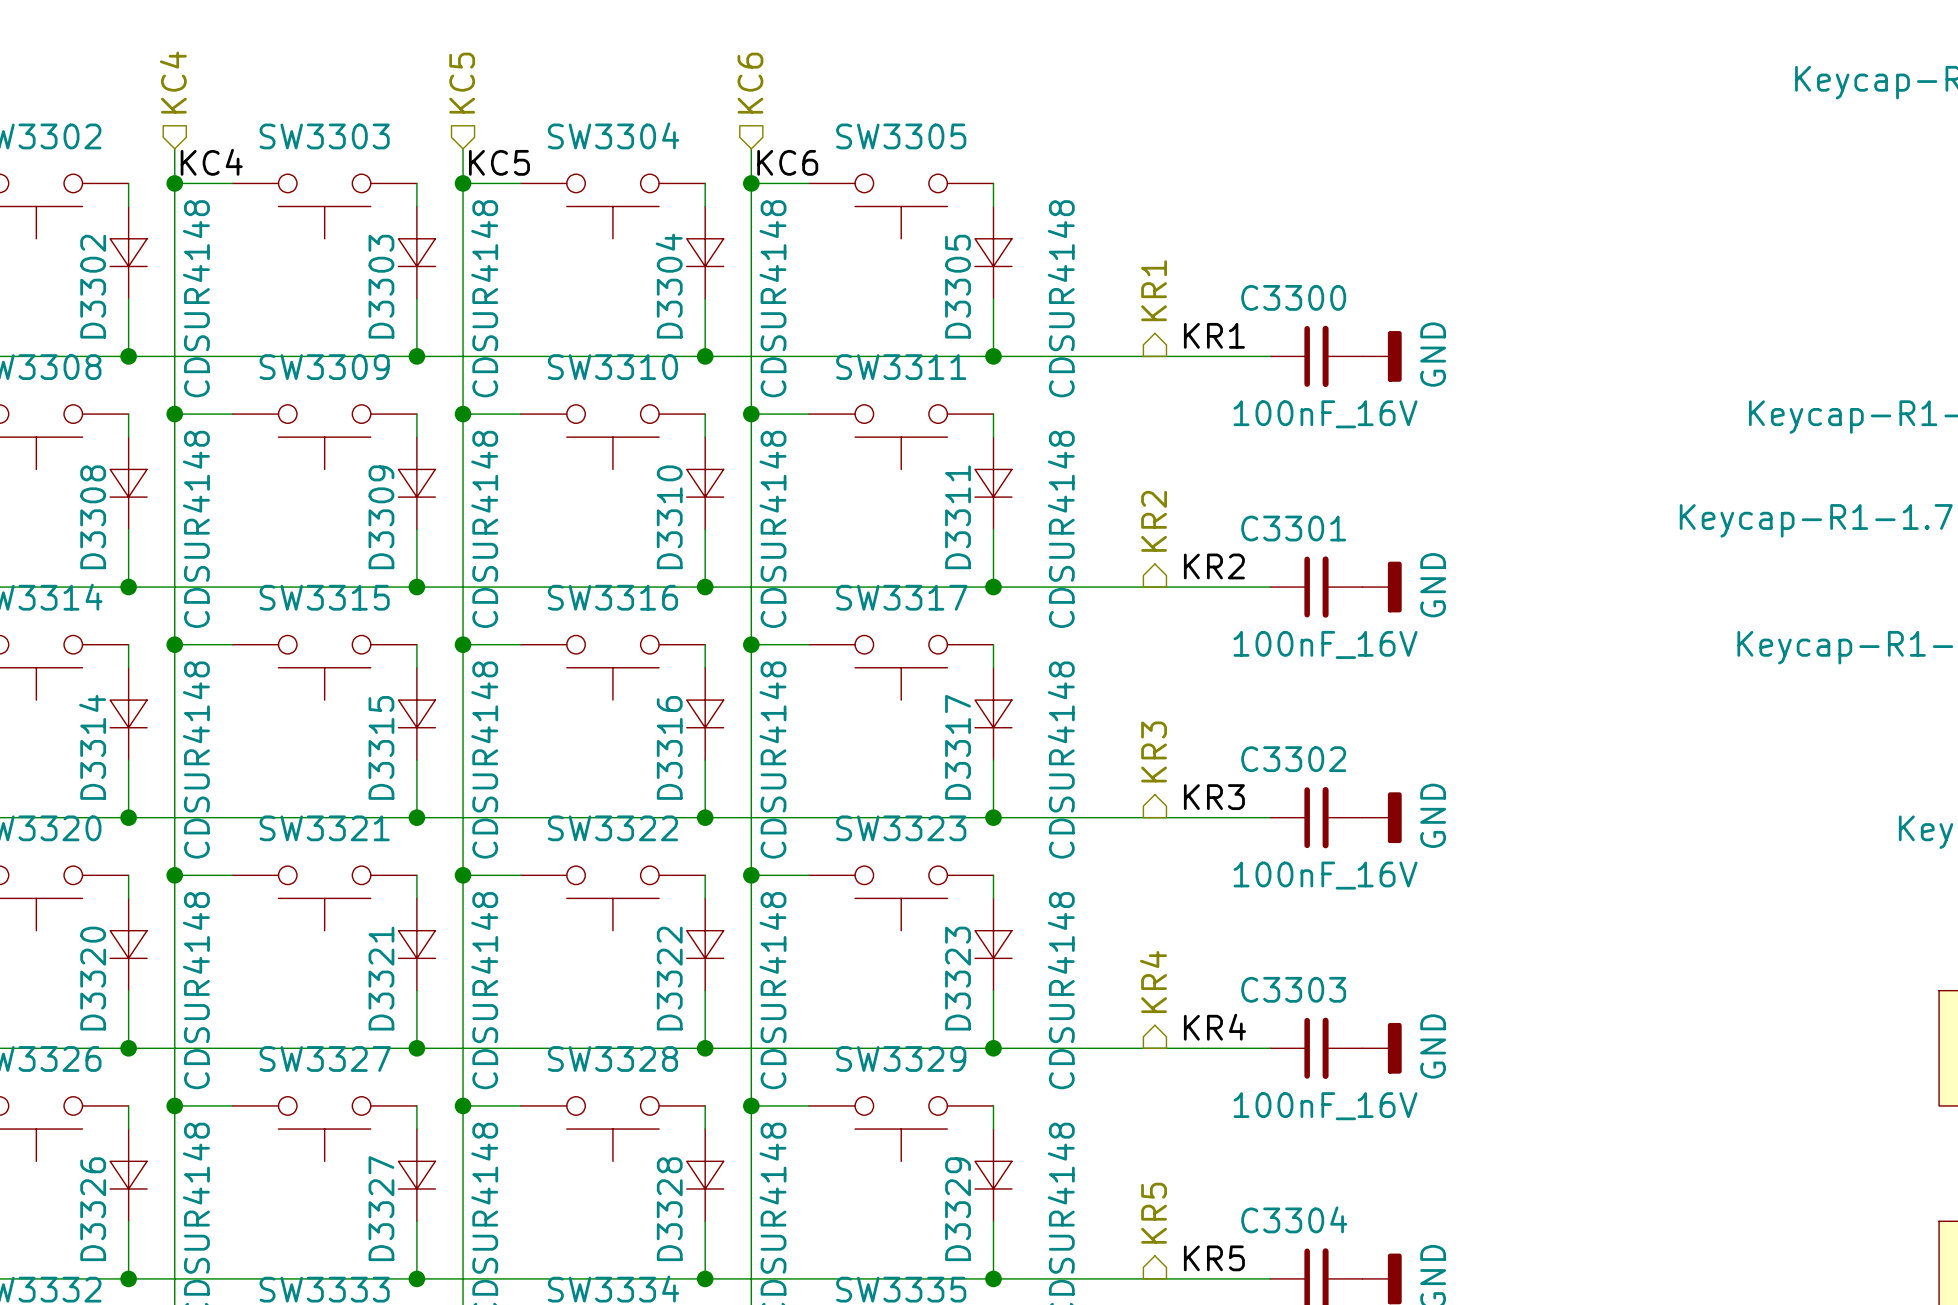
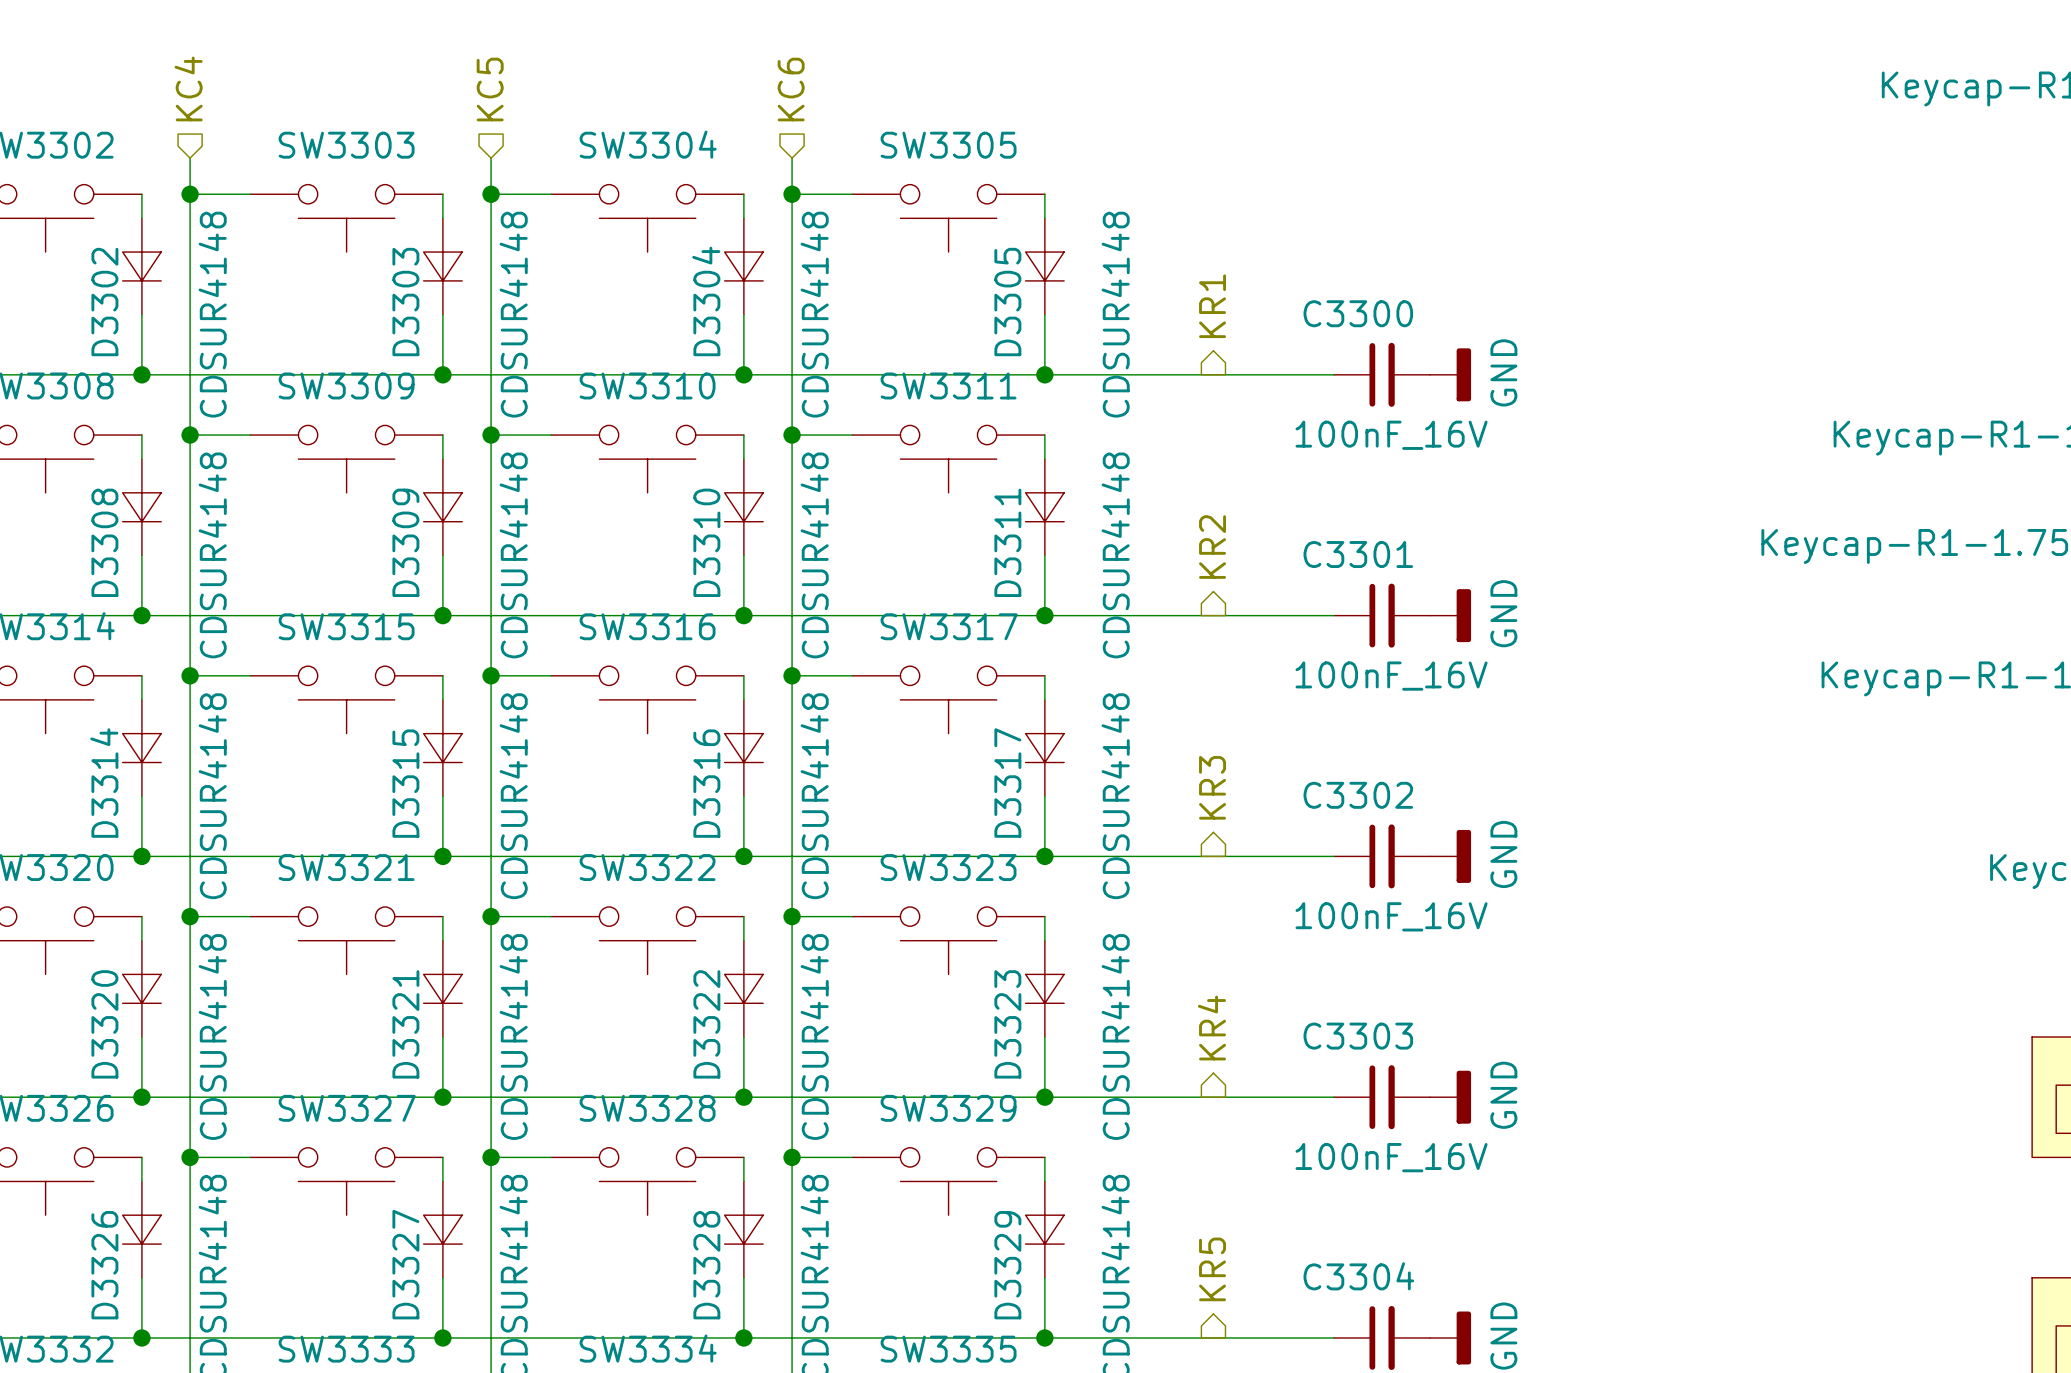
label: KC4 (211, 162) -> none
label: KC5 (499, 162) -> none
label: KC6 (787, 162) -> none
label: KR1 (1214, 335) -> none
label: KR2 (1214, 566) -> none
label: KR3 (1214, 797) -> none
label: KR4 (1214, 1027) -> none
label: KR5 (1214, 1258) -> none

